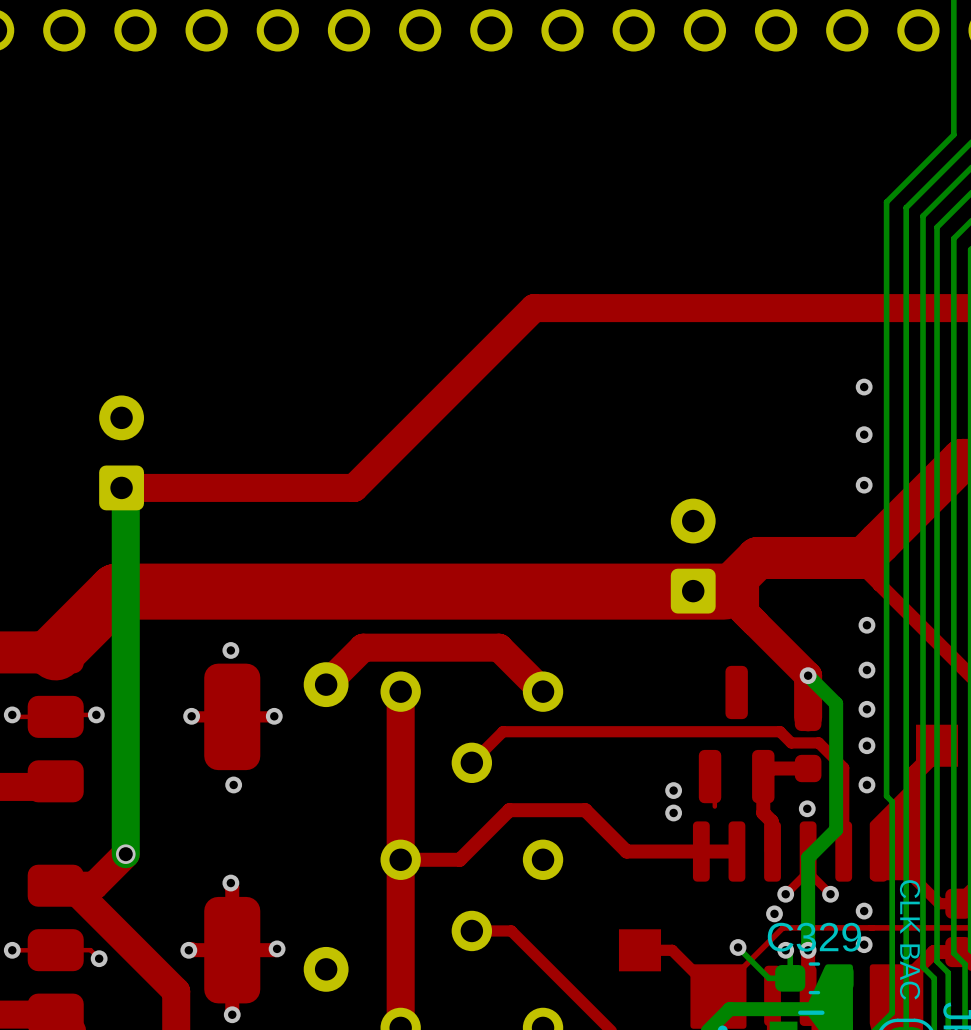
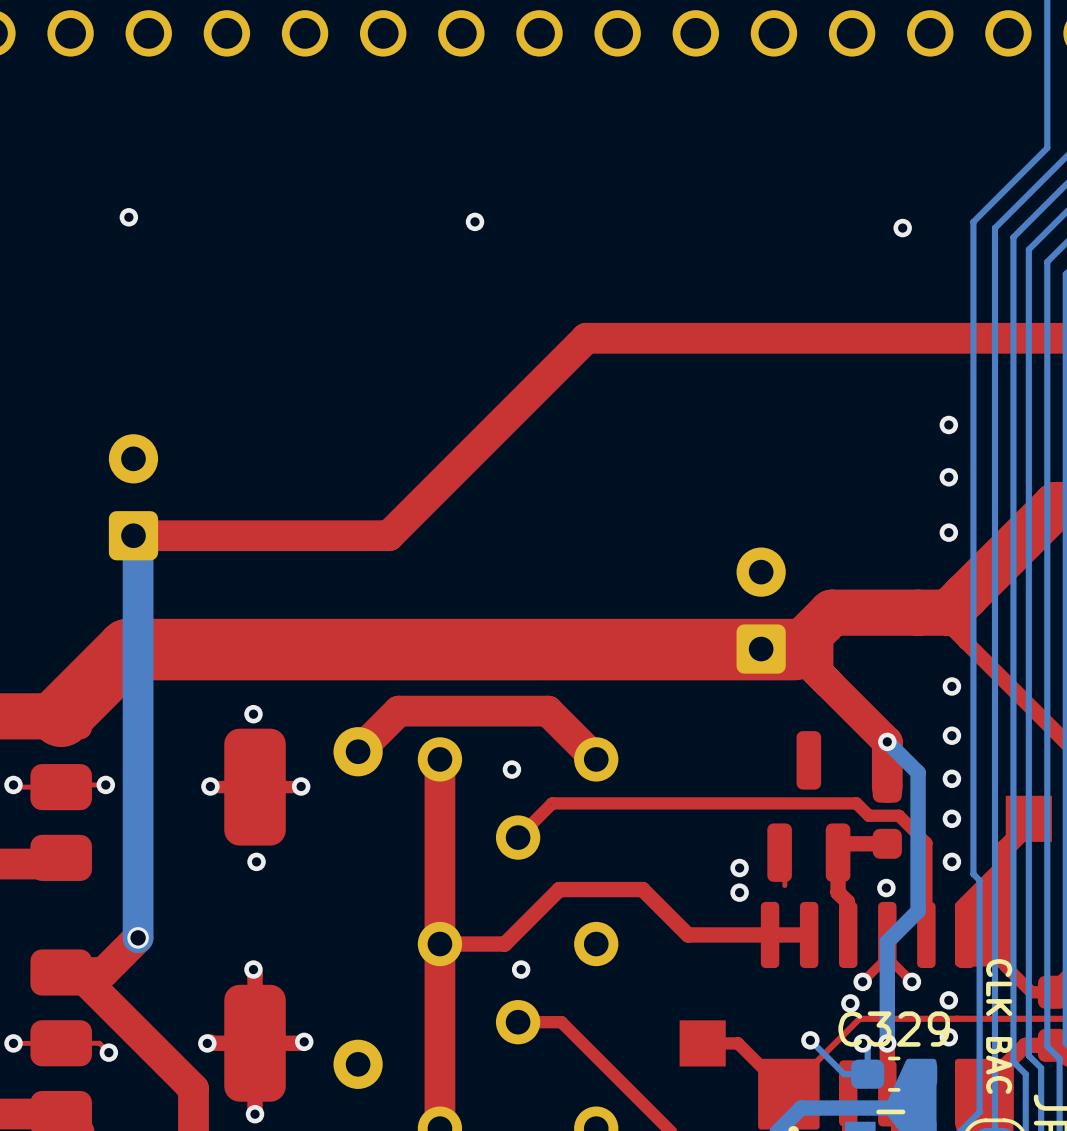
via: none -> (128, 217)
via: none -> (475, 221)
via: none -> (902, 228)
via: none -> (511, 769)
via: none -> (521, 969)

